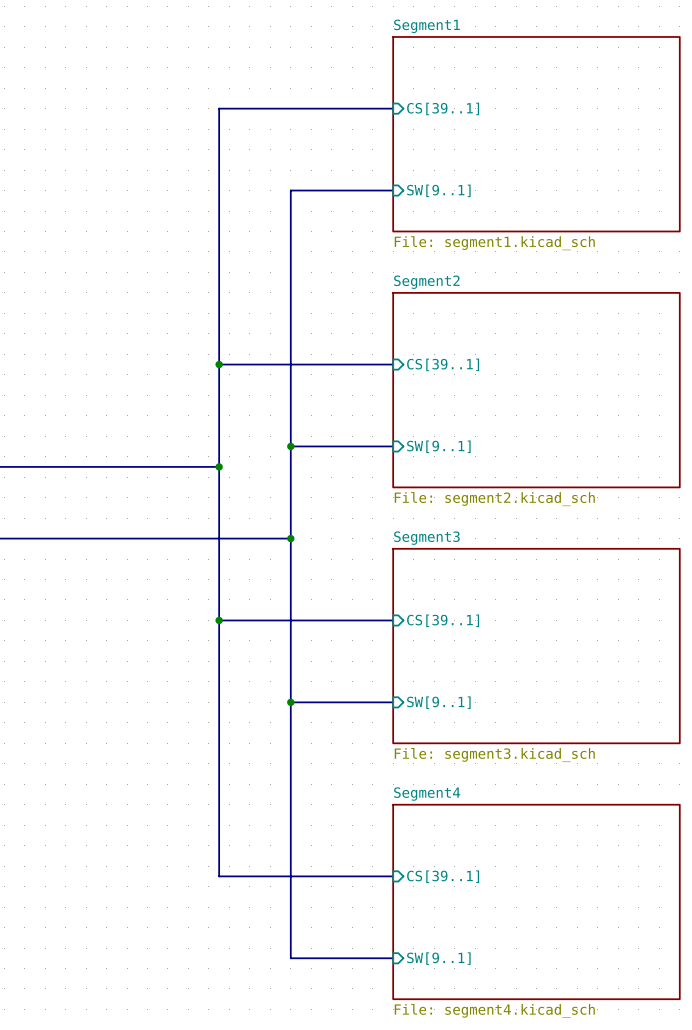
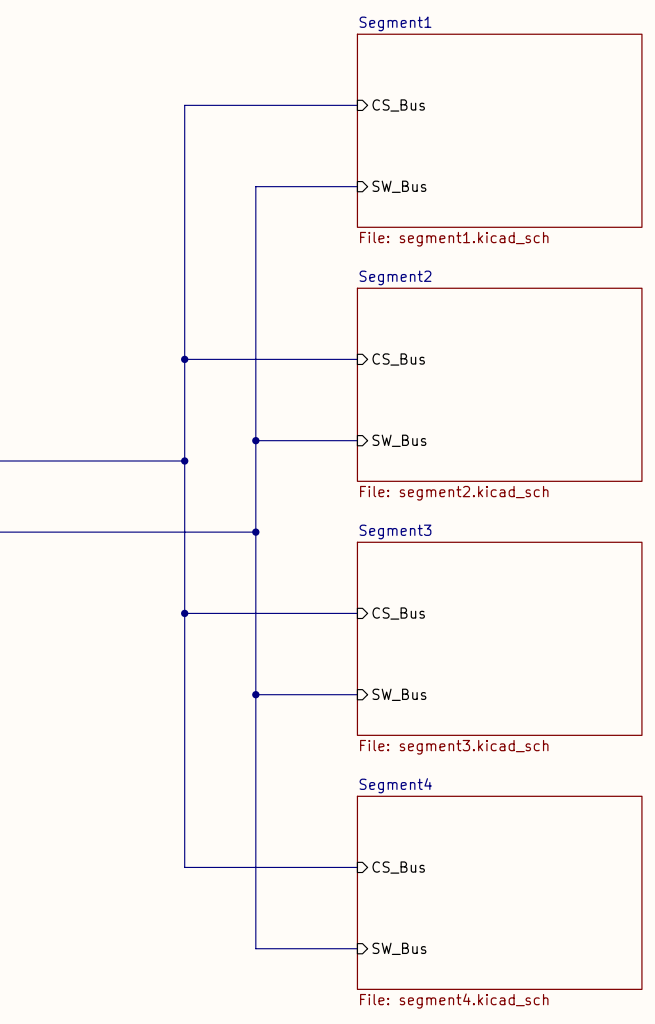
sheet pin: CS[39..1] (443, 108) -> CS_Bus (398, 105)
sheet pin: SW[9..1] (438, 190) -> SW_Bus (399, 186)
sheet pin: CS[39..1] (443, 364) -> CS_Bus (398, 359)
sheet pin: SW[9..1] (438, 446) -> SW_Bus (399, 440)
sheet pin: CS[39..1] (443, 620) -> CS_Bus (398, 613)
sheet pin: SW[9..1] (438, 702) -> SW_Bus (399, 694)
sheet pin: CS[39..1] (443, 876) -> CS_Bus (398, 867)
sheet pin: SW[9..1] (438, 958) -> SW_Bus (399, 948)

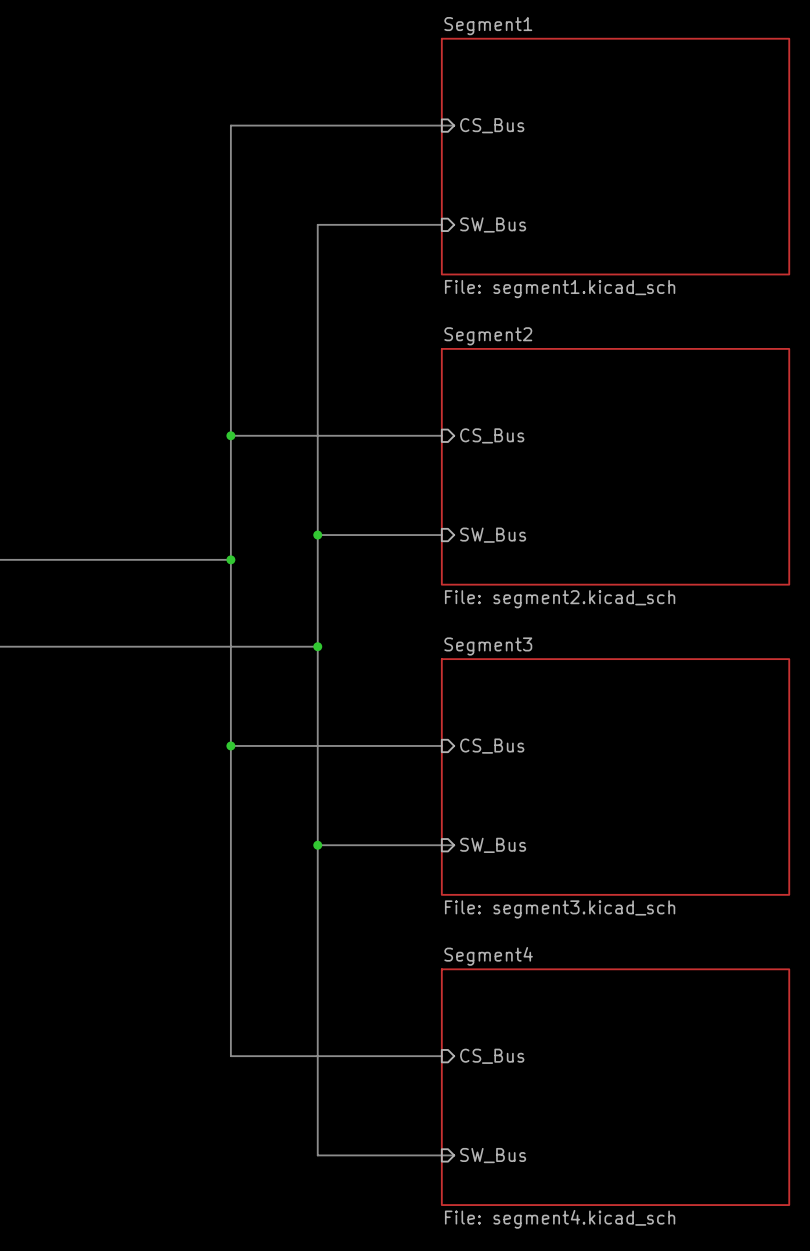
bus: none -> (441, 125) (454, 125)
bus: none -> (441, 845) (454, 845)
bus: none -> (441, 1155) (454, 1155)

